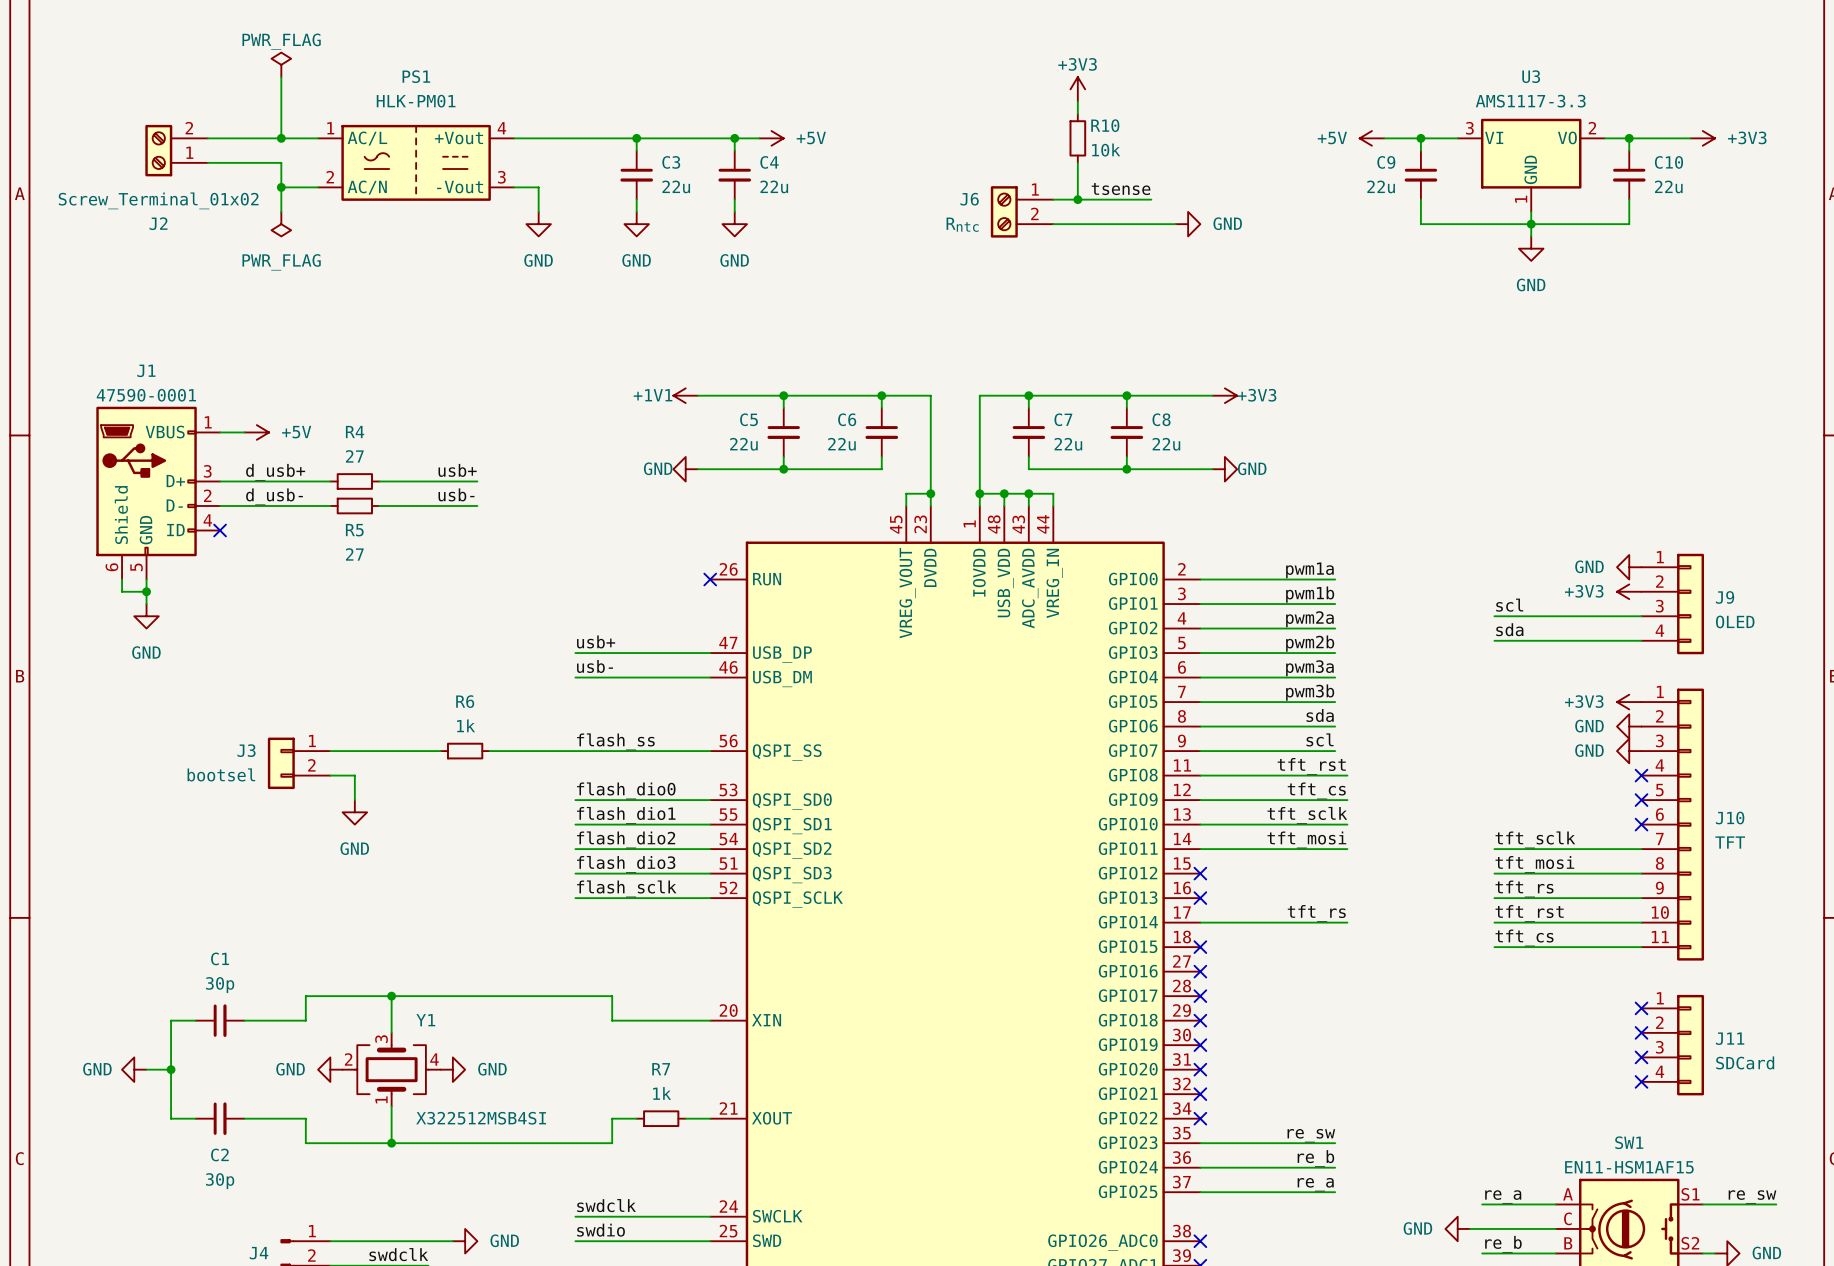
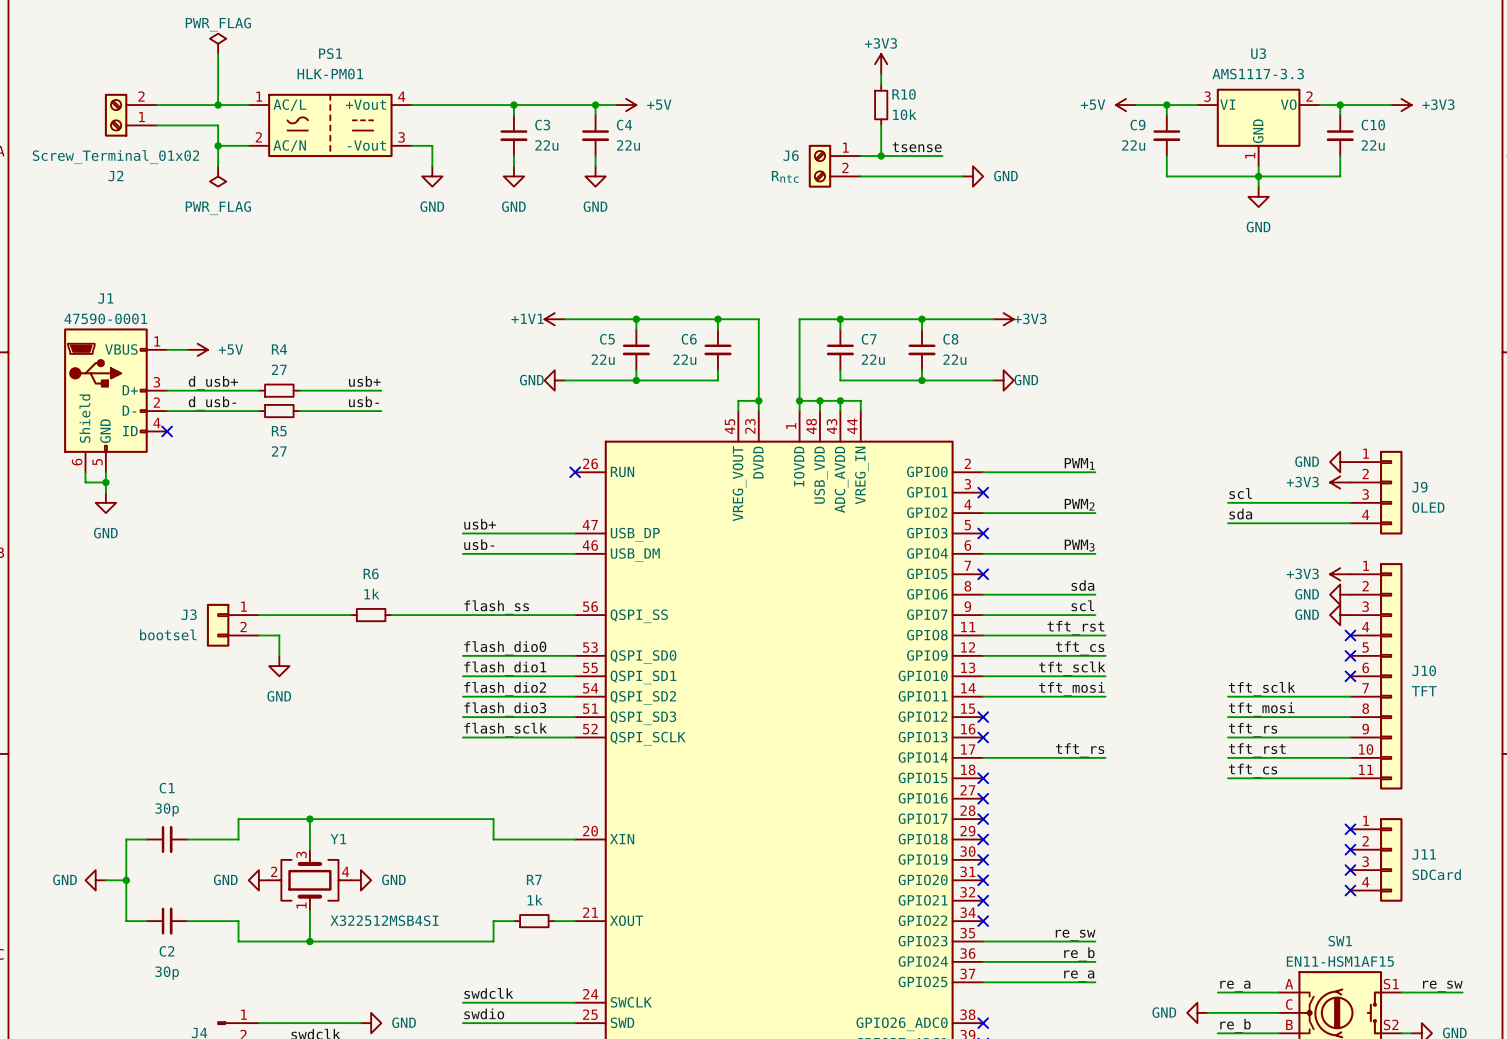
label: pwm1a (1309, 570) -> PWM1 (1079, 463)
label: pwm1b (1310, 594) -> none
wire: (1200, 604) (1335, 604) -> none
no-connect mark: none -> (983, 492)
label: pwm2a (1309, 619) -> PWM2 (1079, 504)
label: pwm2b (1310, 643) -> none
wire: (1200, 653) (1335, 653) -> none
no-connect mark: none -> (983, 533)
label: pwm3a (1309, 668) -> PWM3 (1079, 545)
label: pwm3b (1310, 692) -> none
wire: (1200, 702) (1335, 702) -> none
no-connect mark: none -> (983, 574)

